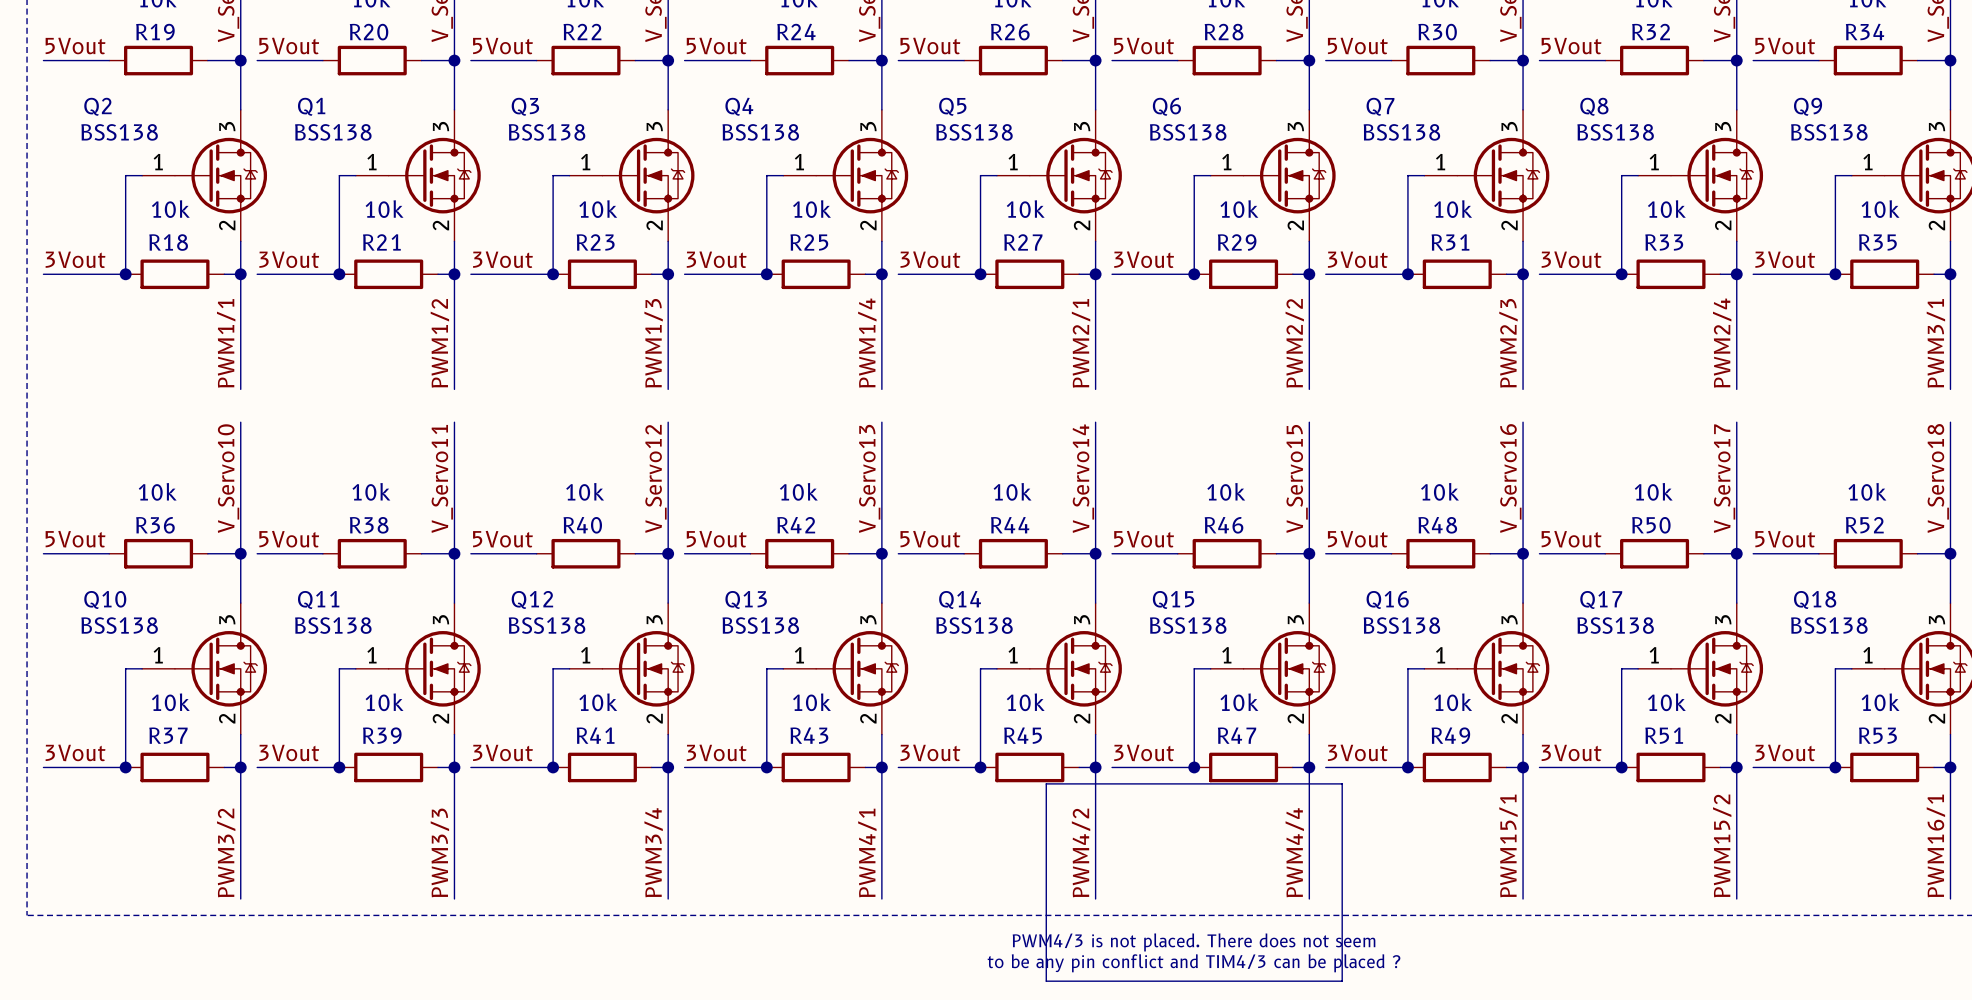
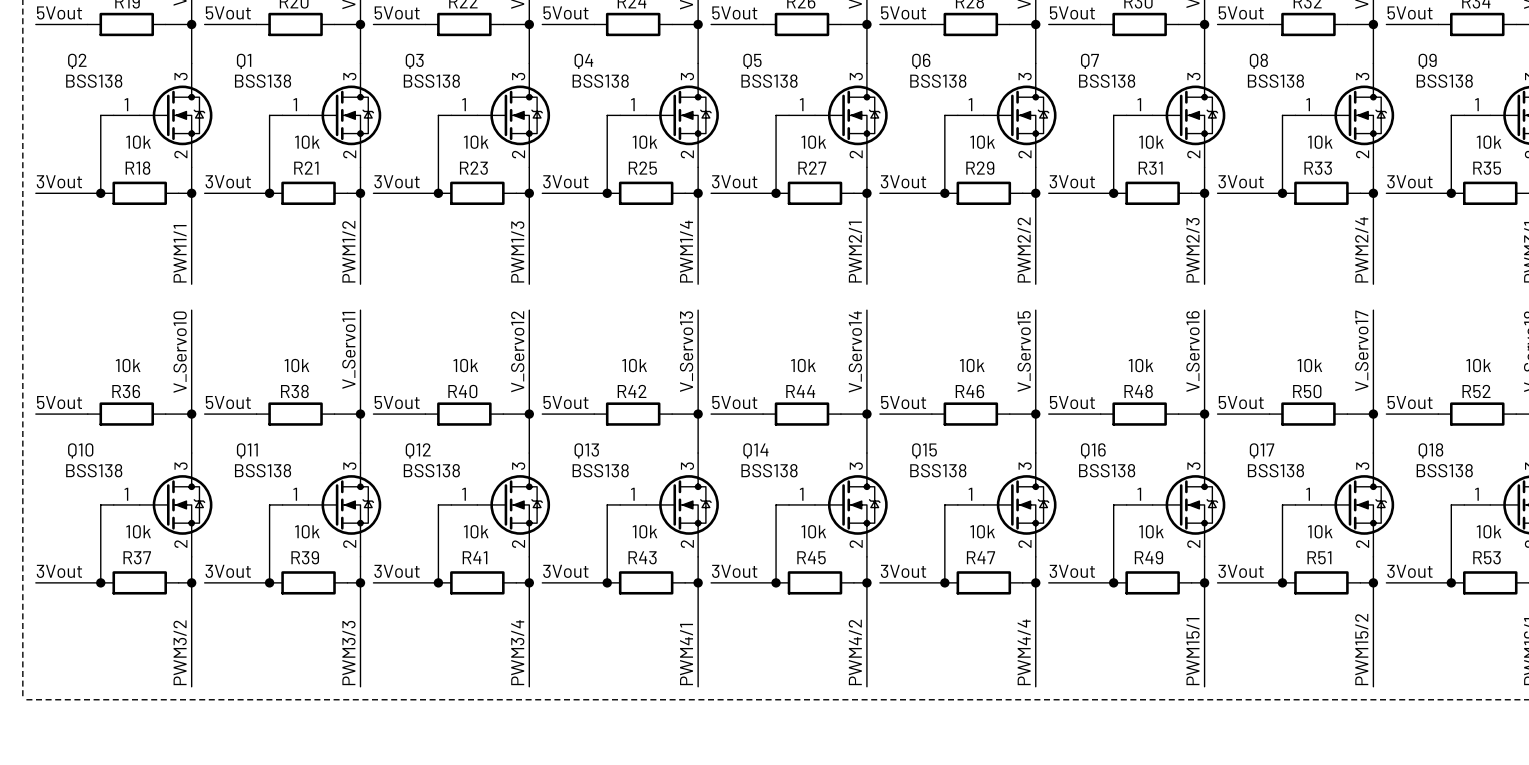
line: (1046, 783) (1342, 783) (1342, 981) (1046, 981) (1046, 783) -> none
text: PWM4/3 is not placed. There does not seem (1194, 942) -> none
text: to be any pin conflict and TIM4/3 can be placed ? (1194, 963) -> none

